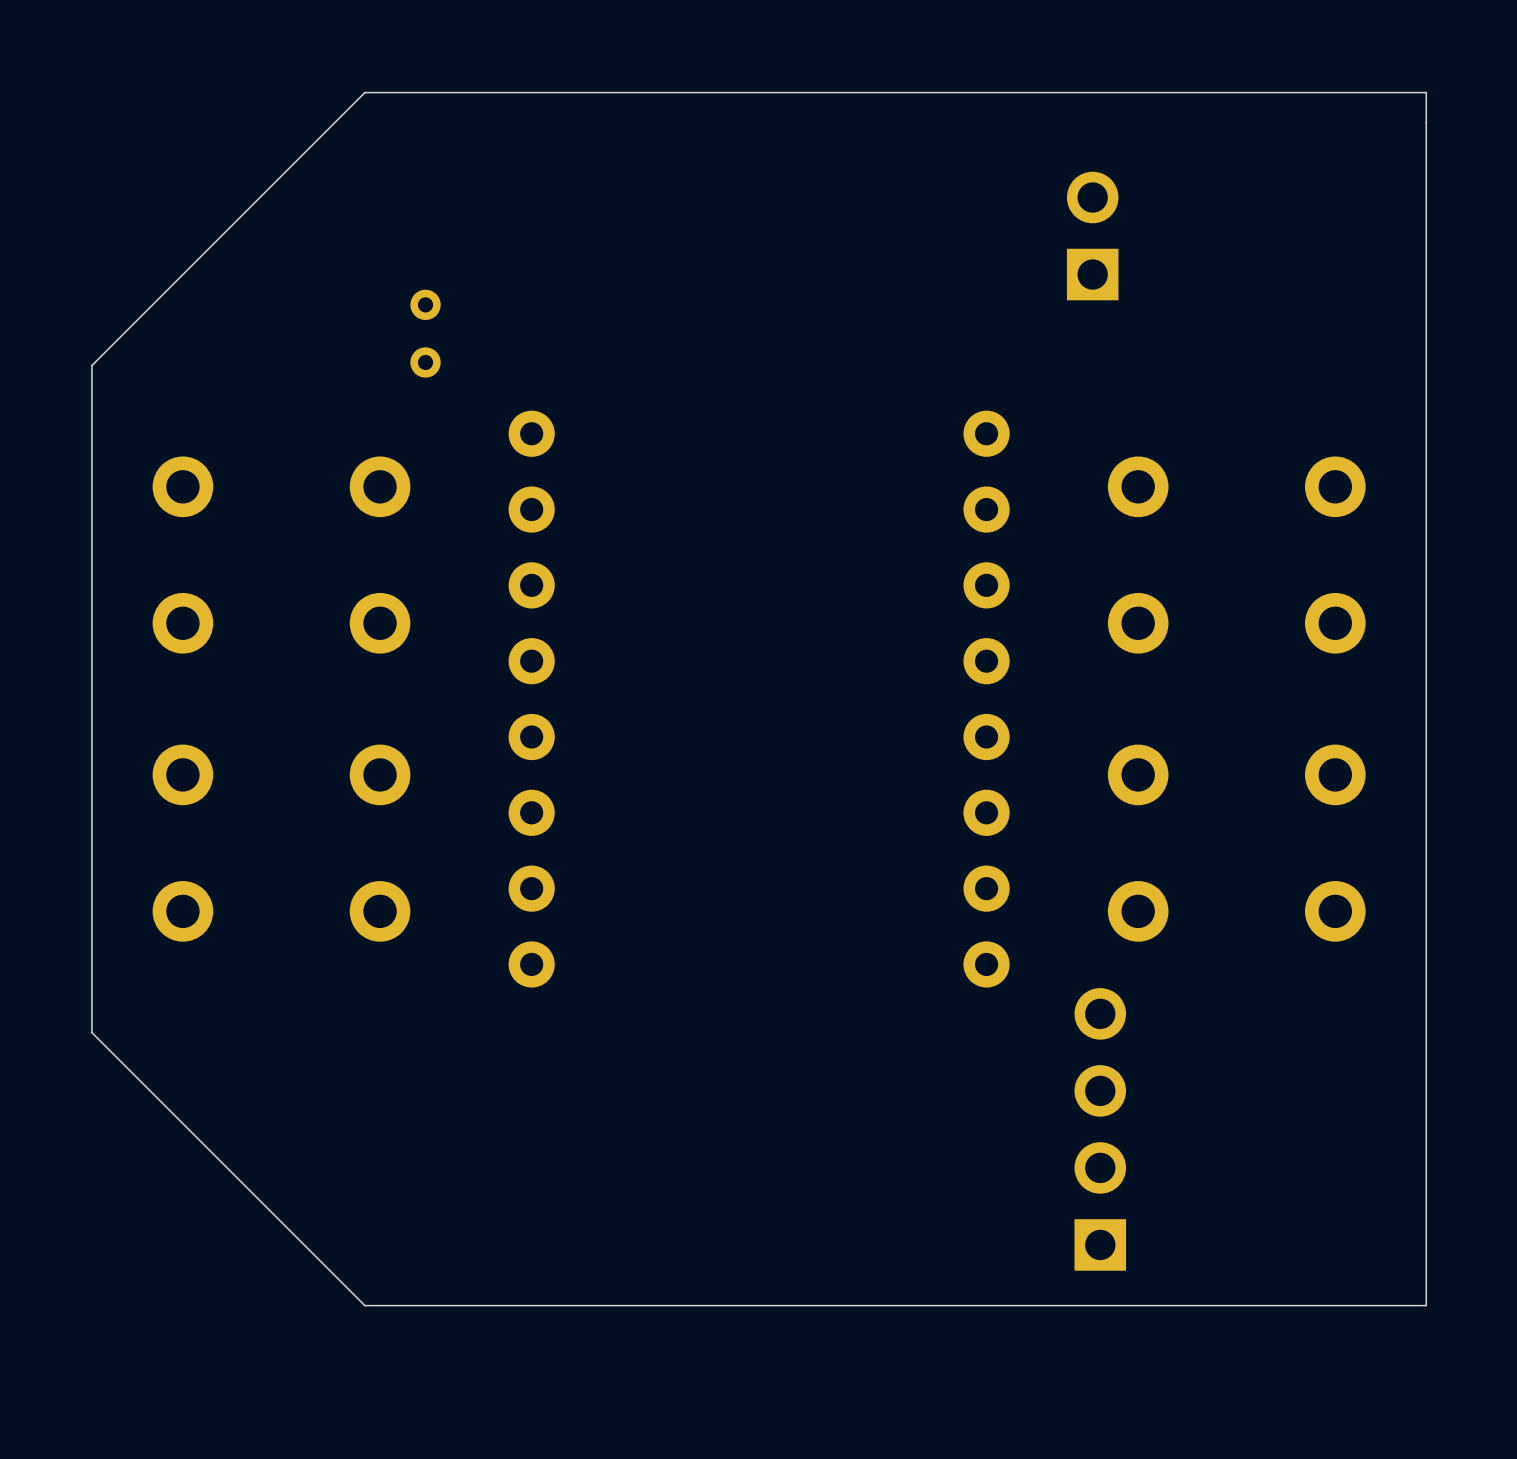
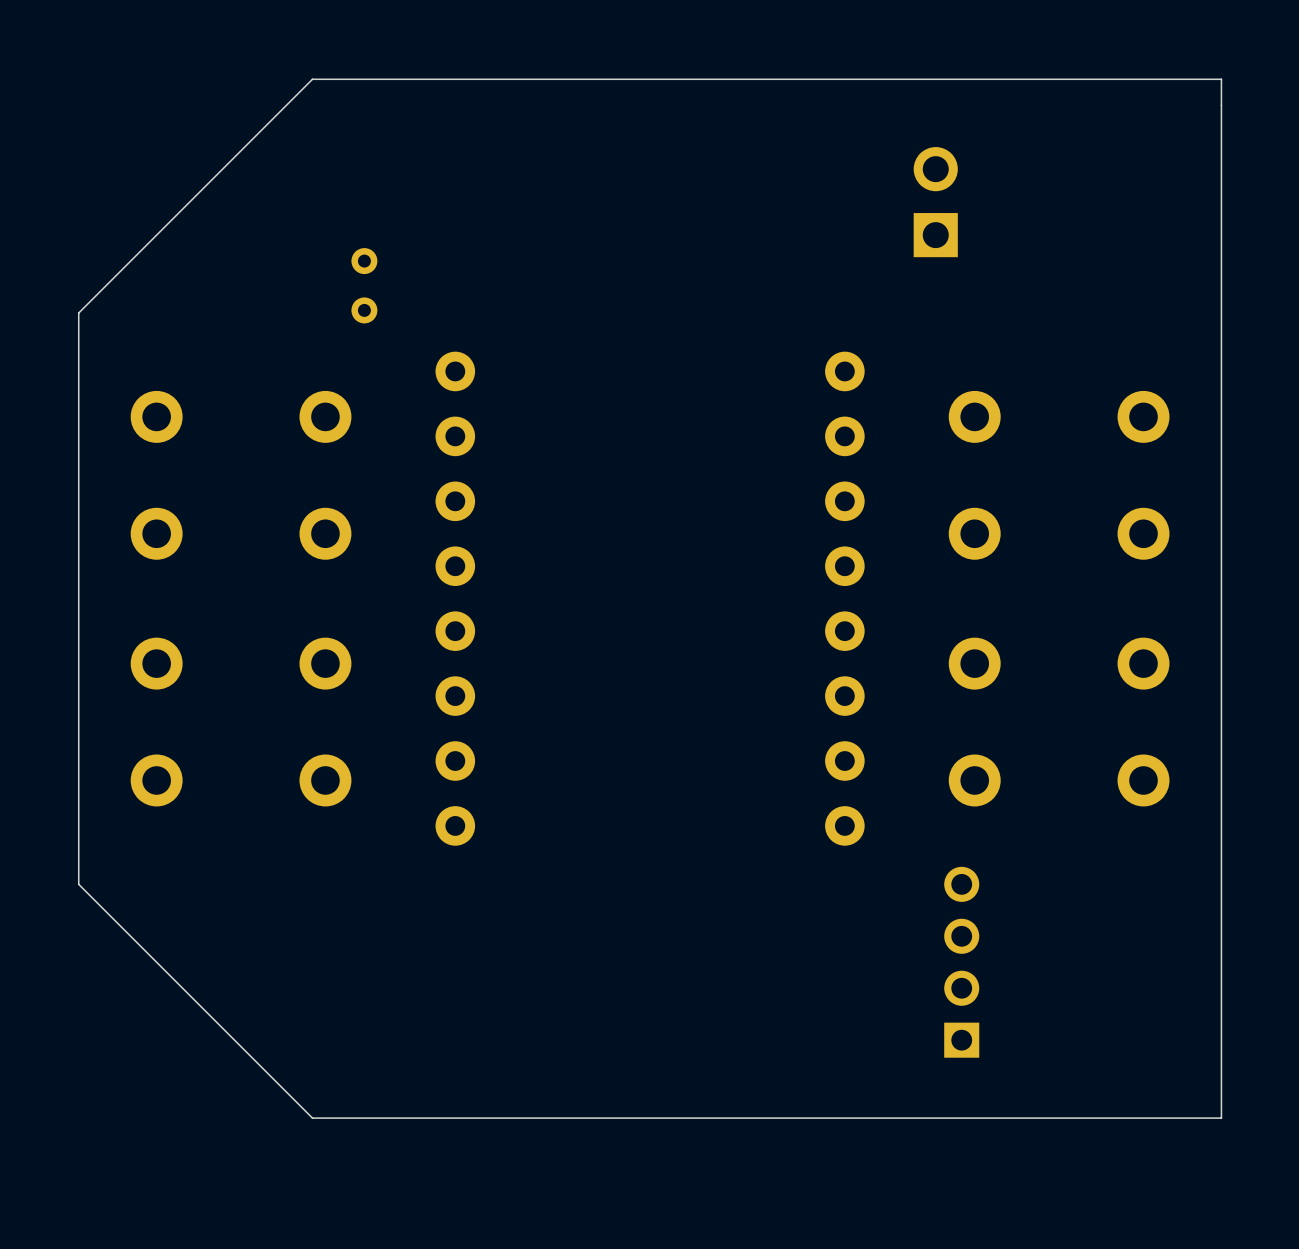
part footprint: [1074, 988, 1127, 1271] -> [944, 866, 980, 1058]

